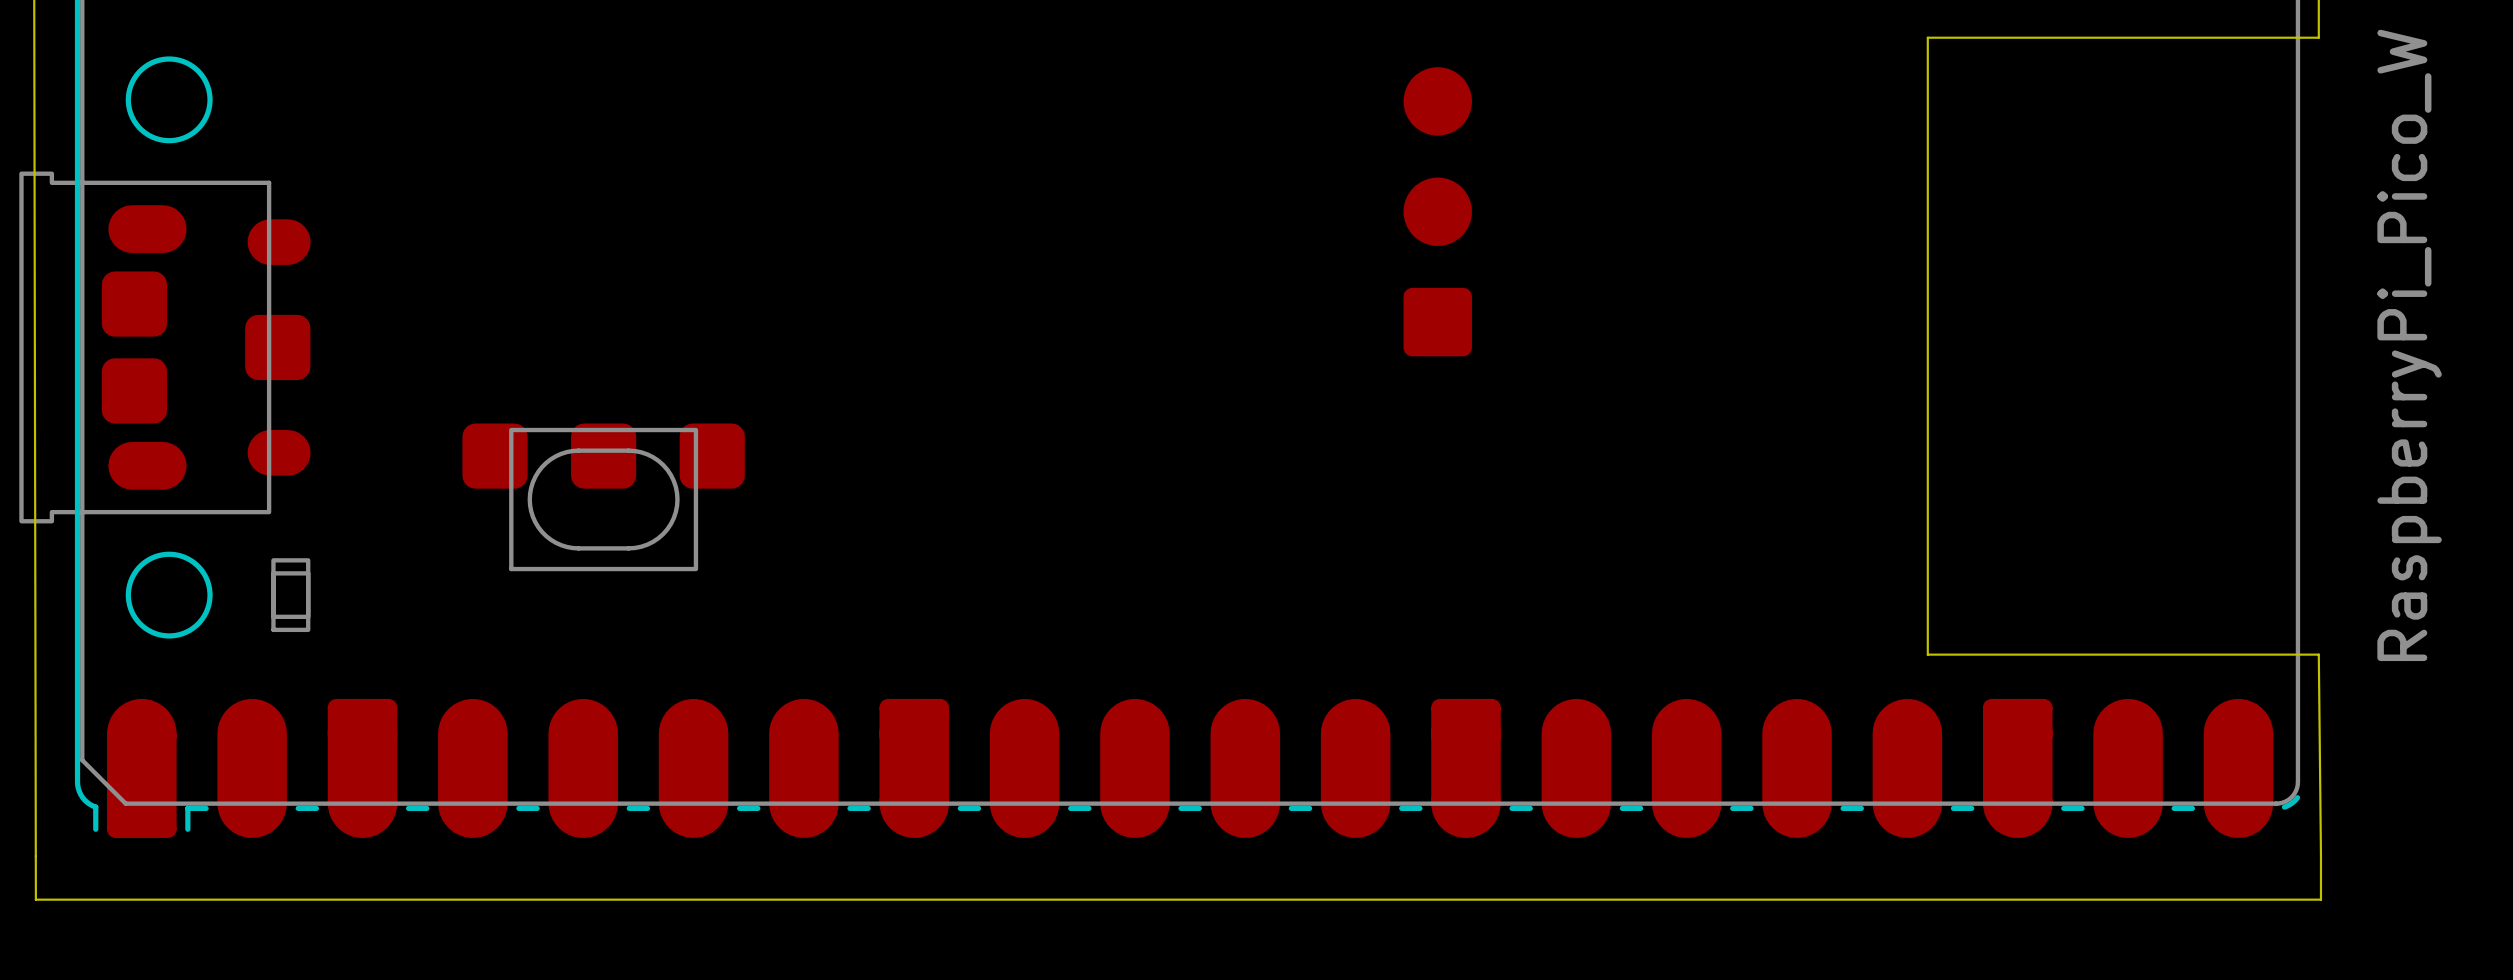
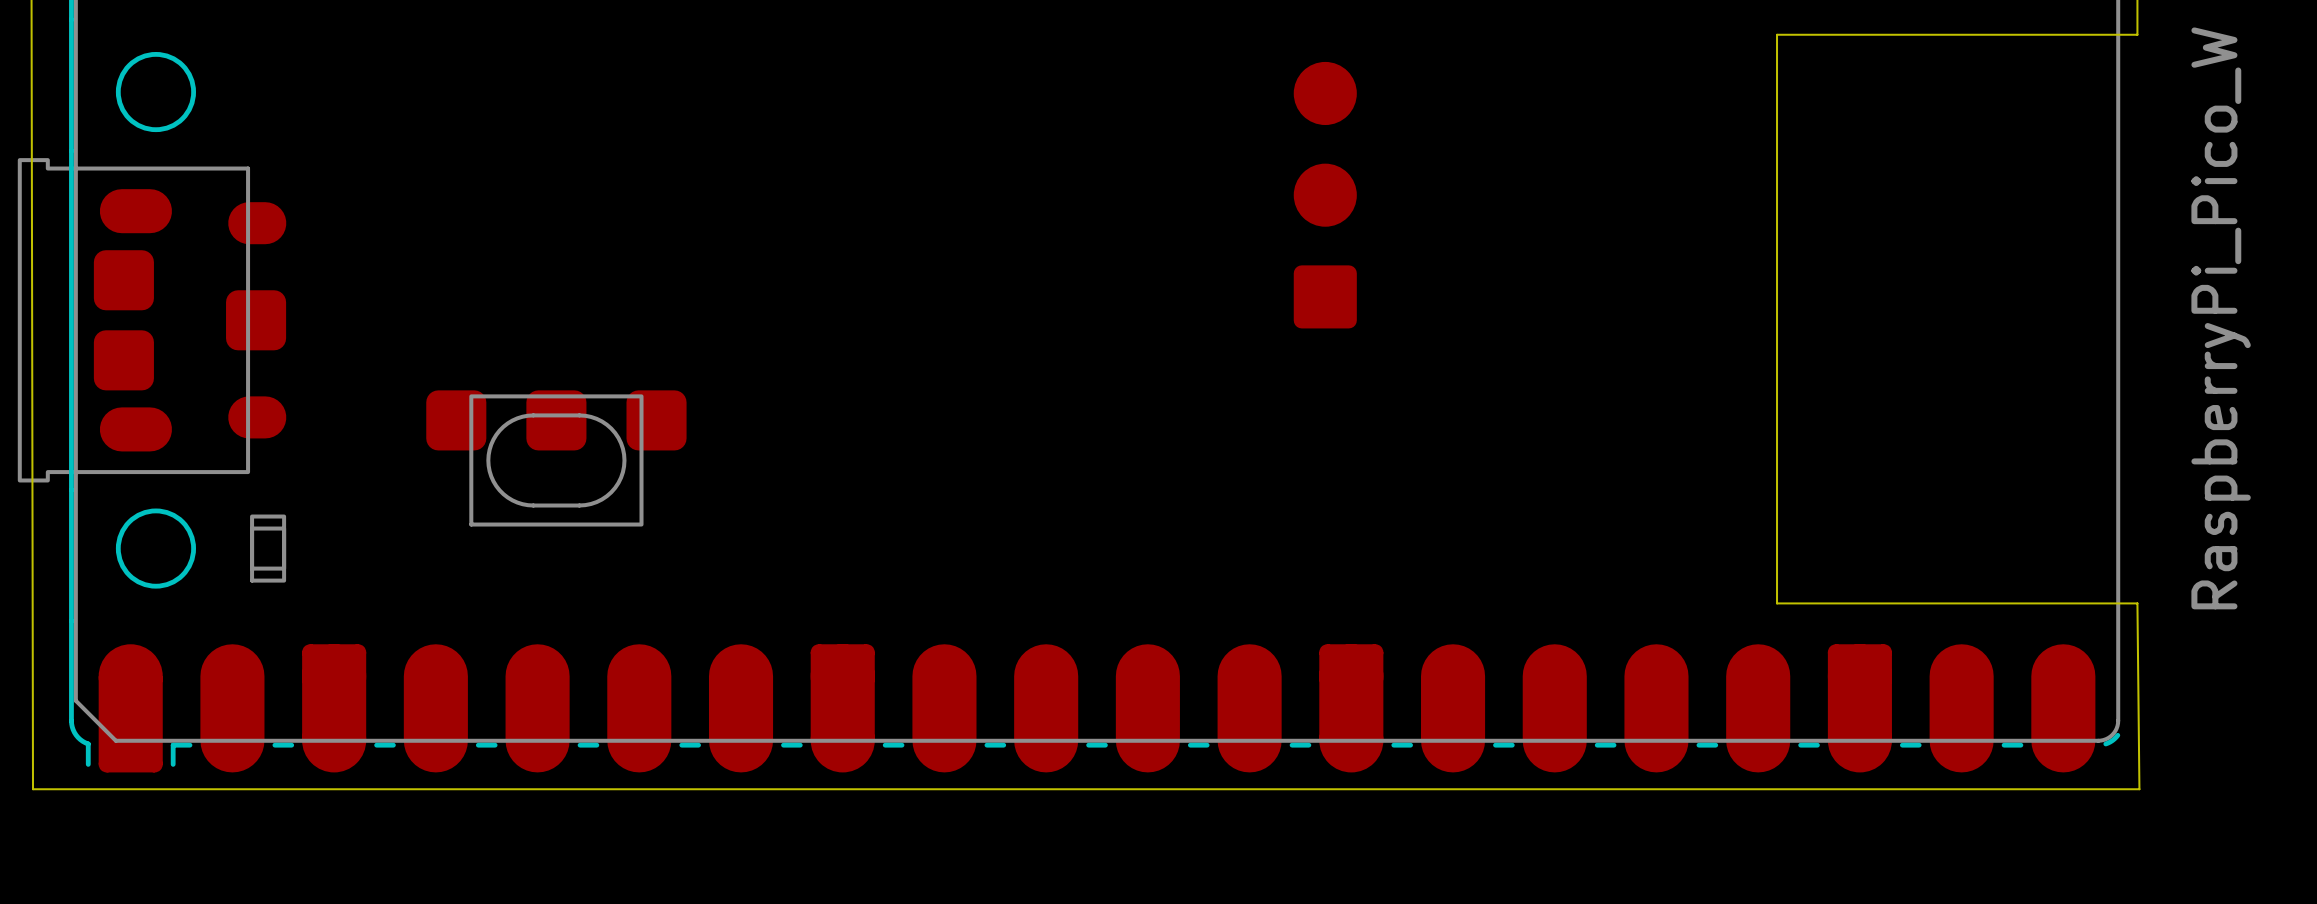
board edge: (35, 856) (35, 899) (2320, 899) (2320, 856) -> (33, 789) (2139, 789)

